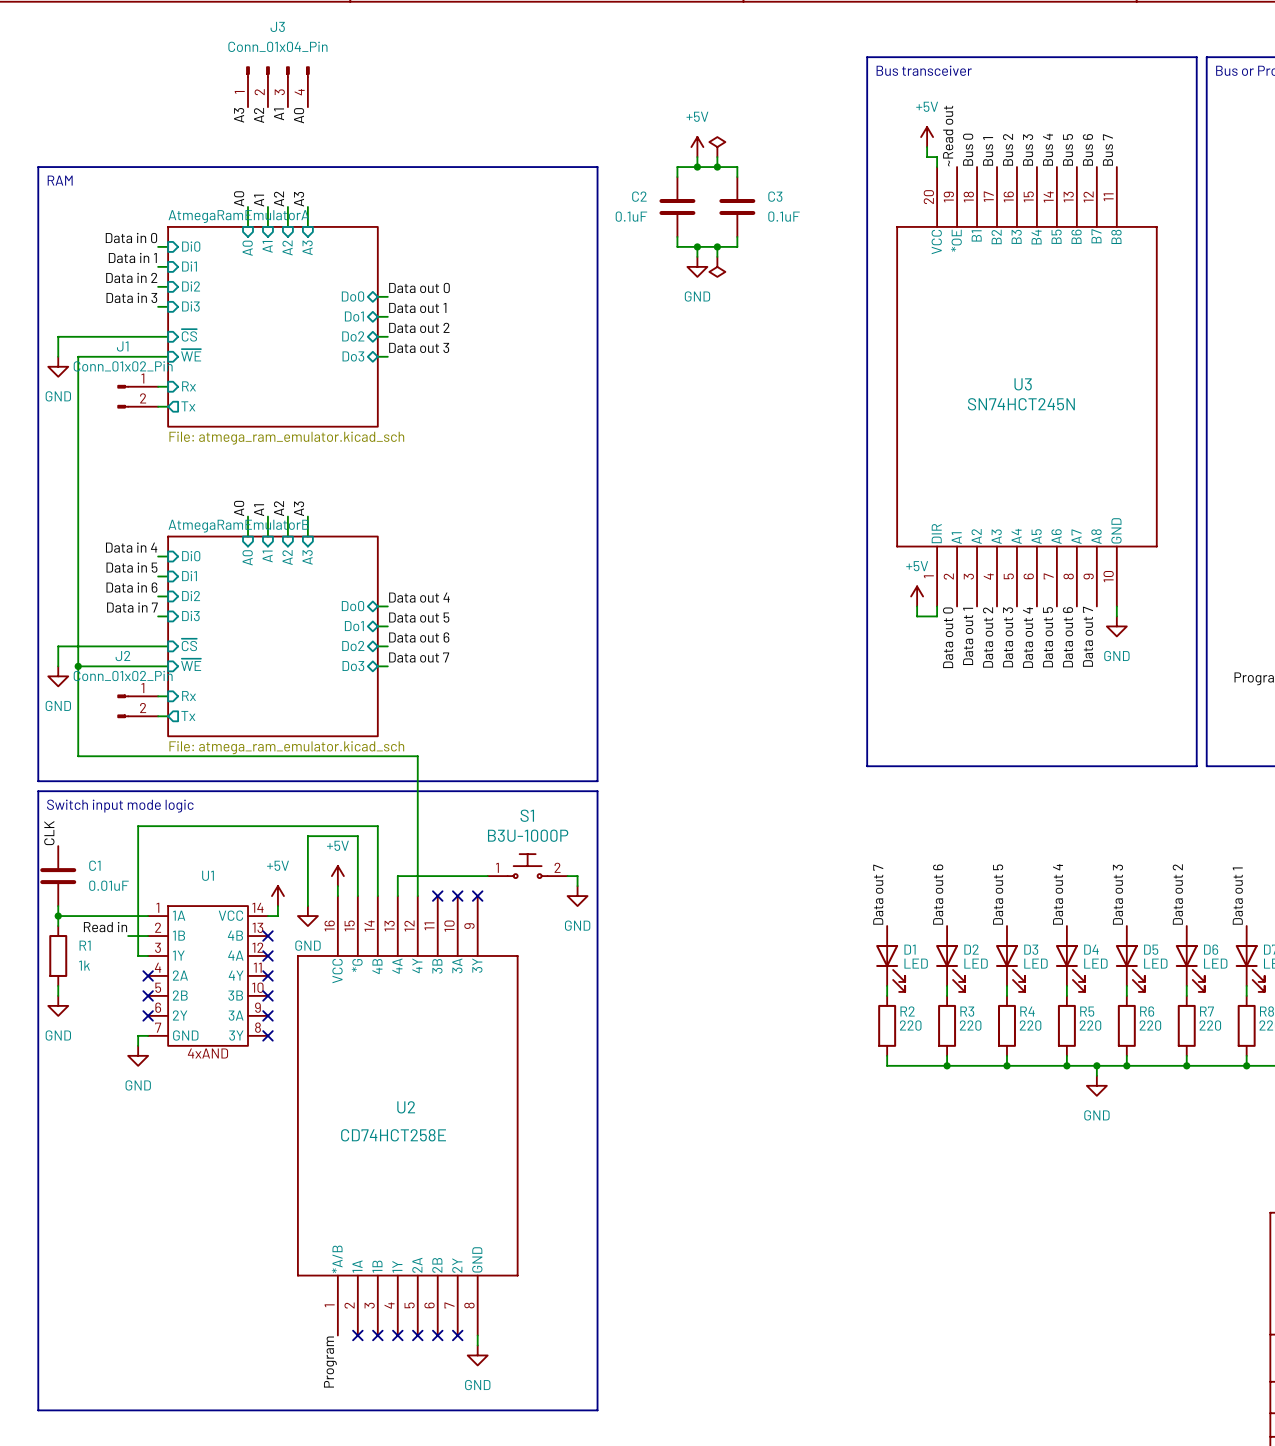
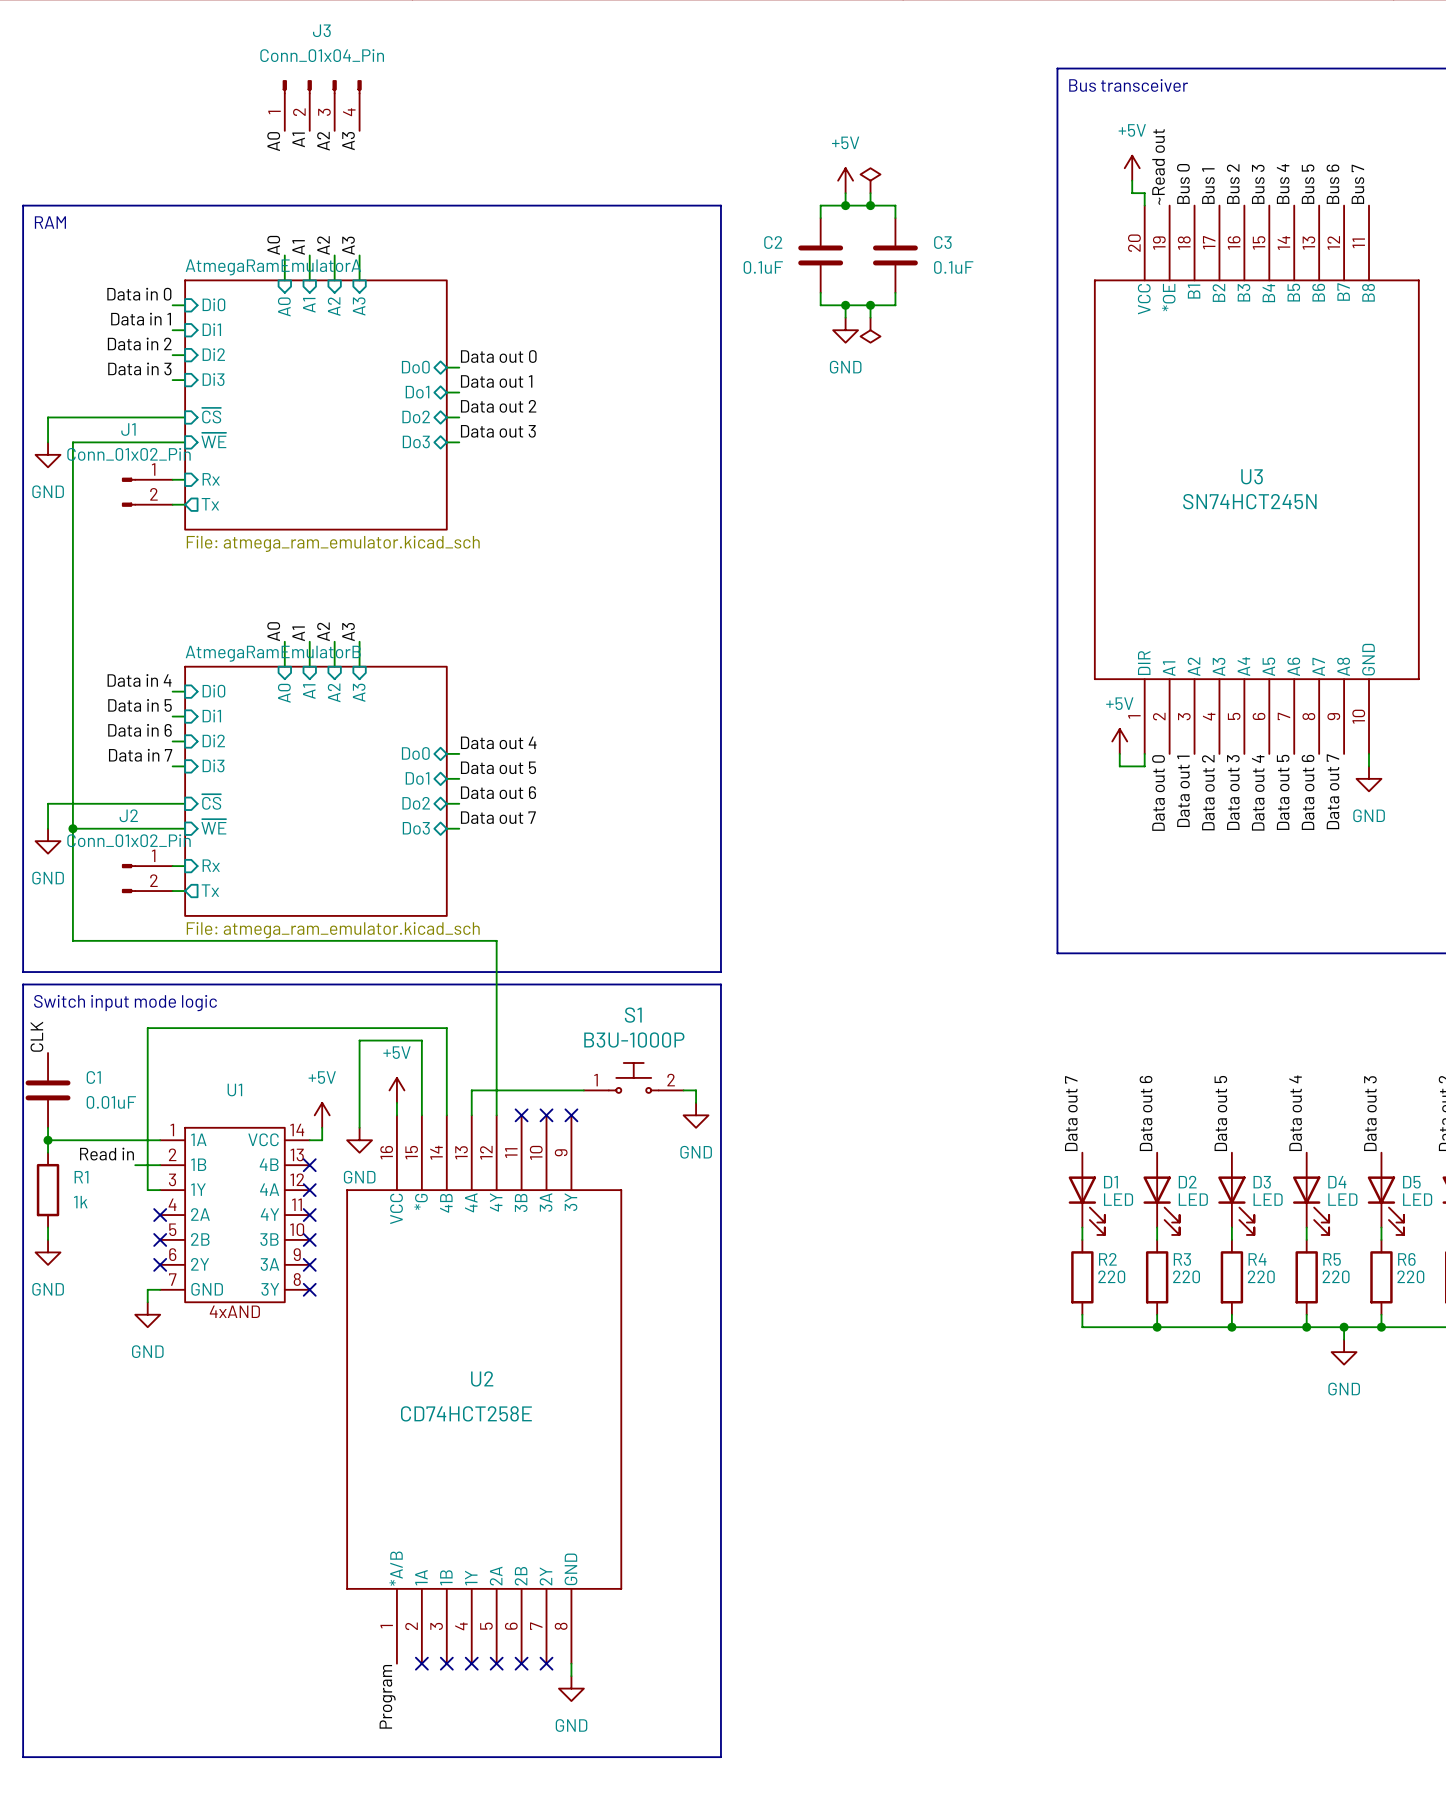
label: A1 (279, 114) -> A2 (323, 141)
label: A3 (239, 115) -> A0 (273, 141)
label: A2 (259, 115) -> A1 (298, 139)
label: A0 (299, 115) -> A3 (348, 141)

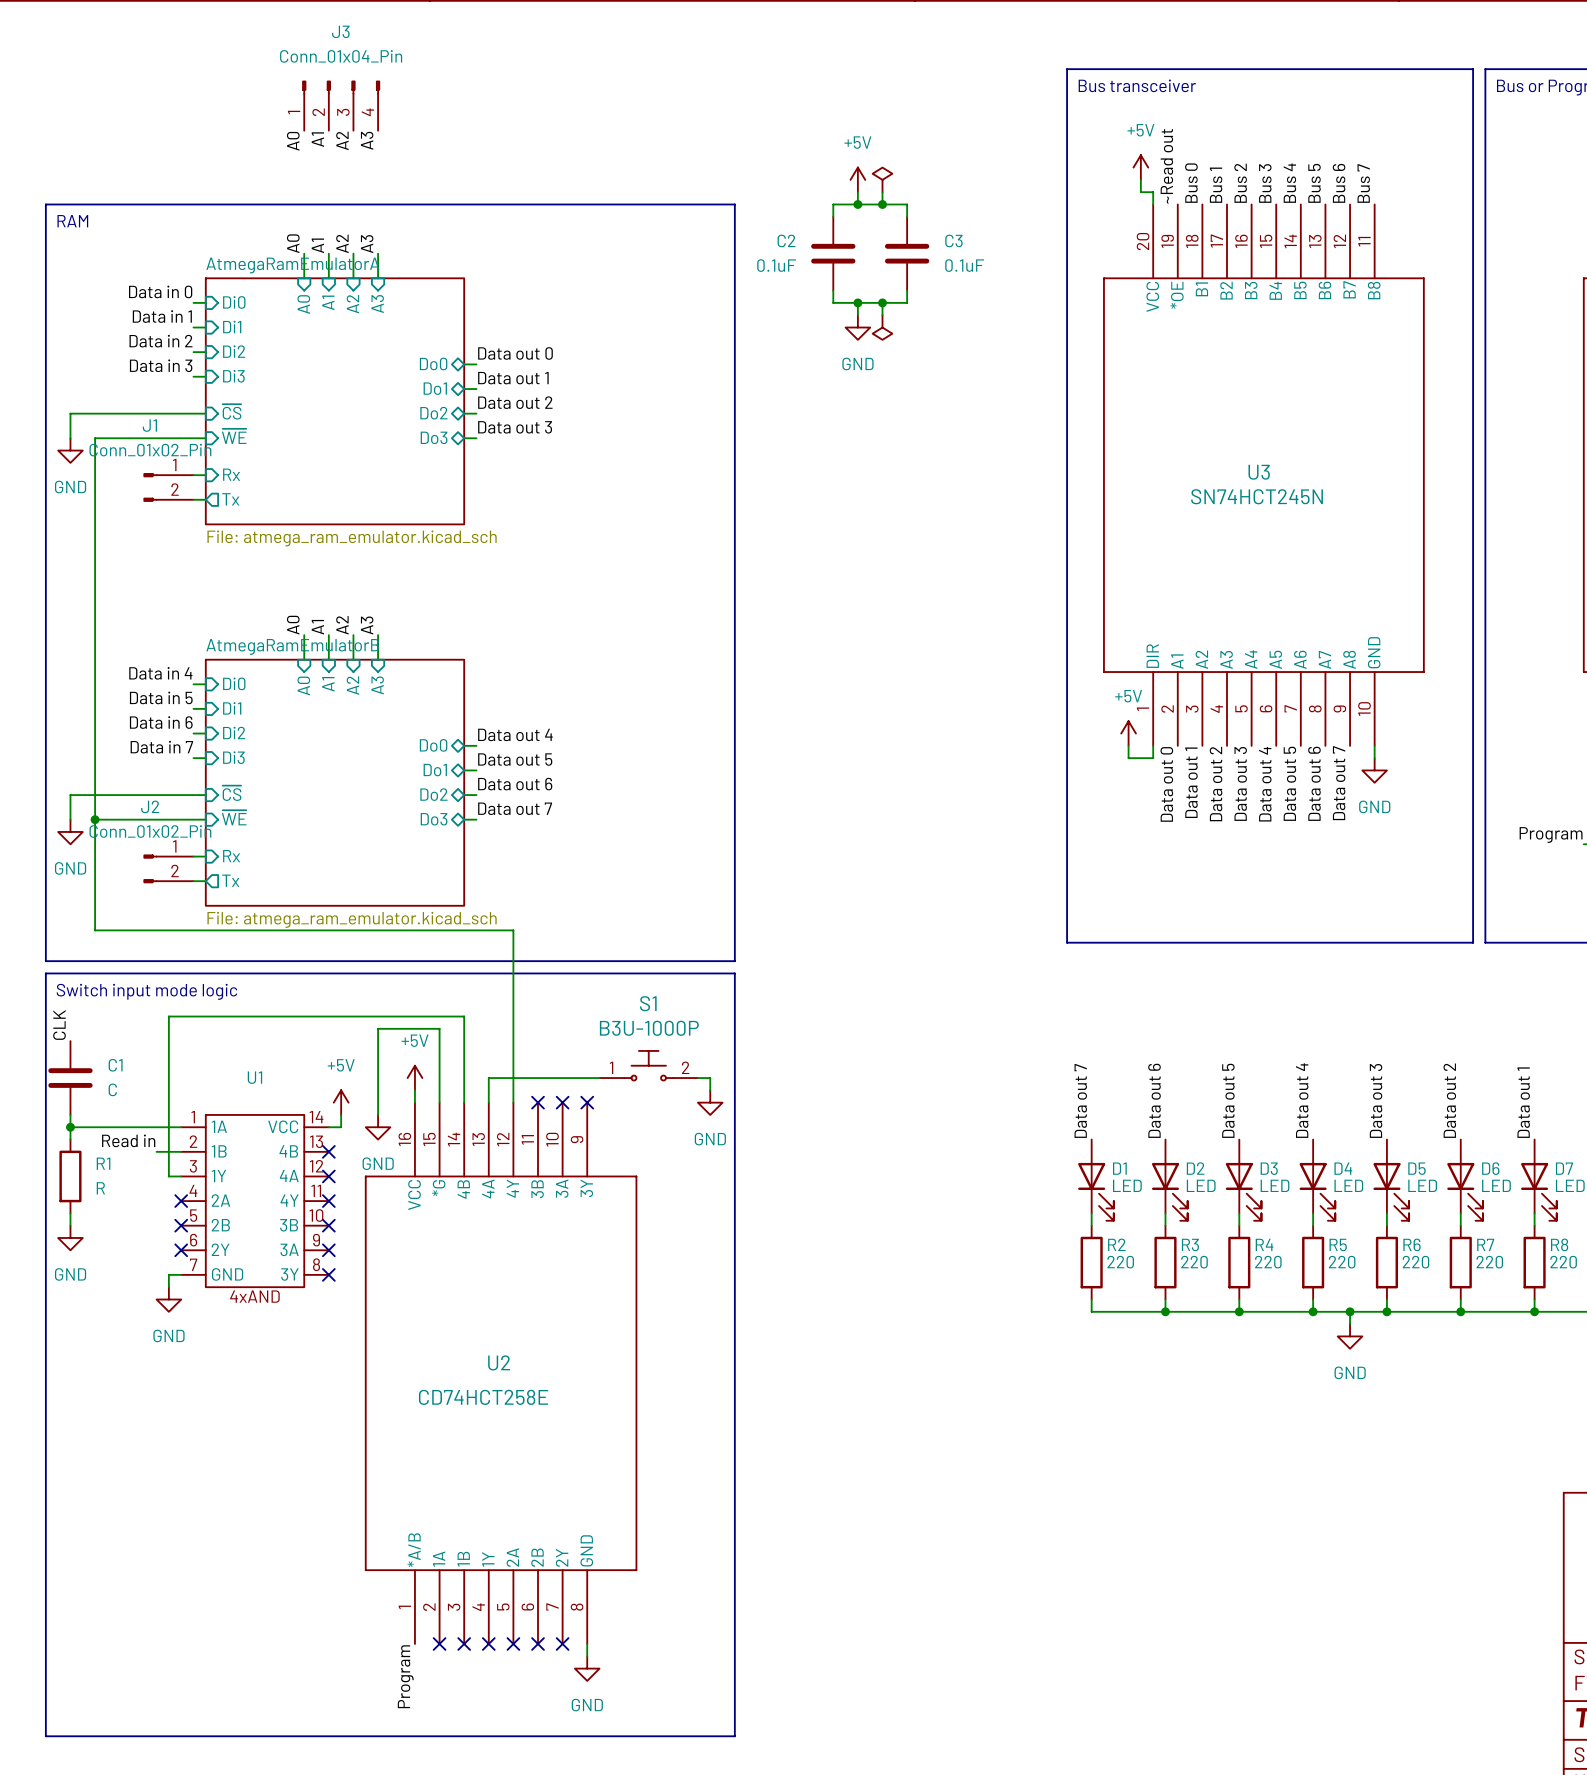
C1 value: 0.01uF (111, 1102) -> C (112, 1089)
R1 value: 1k (80, 1202) -> R (100, 1188)

